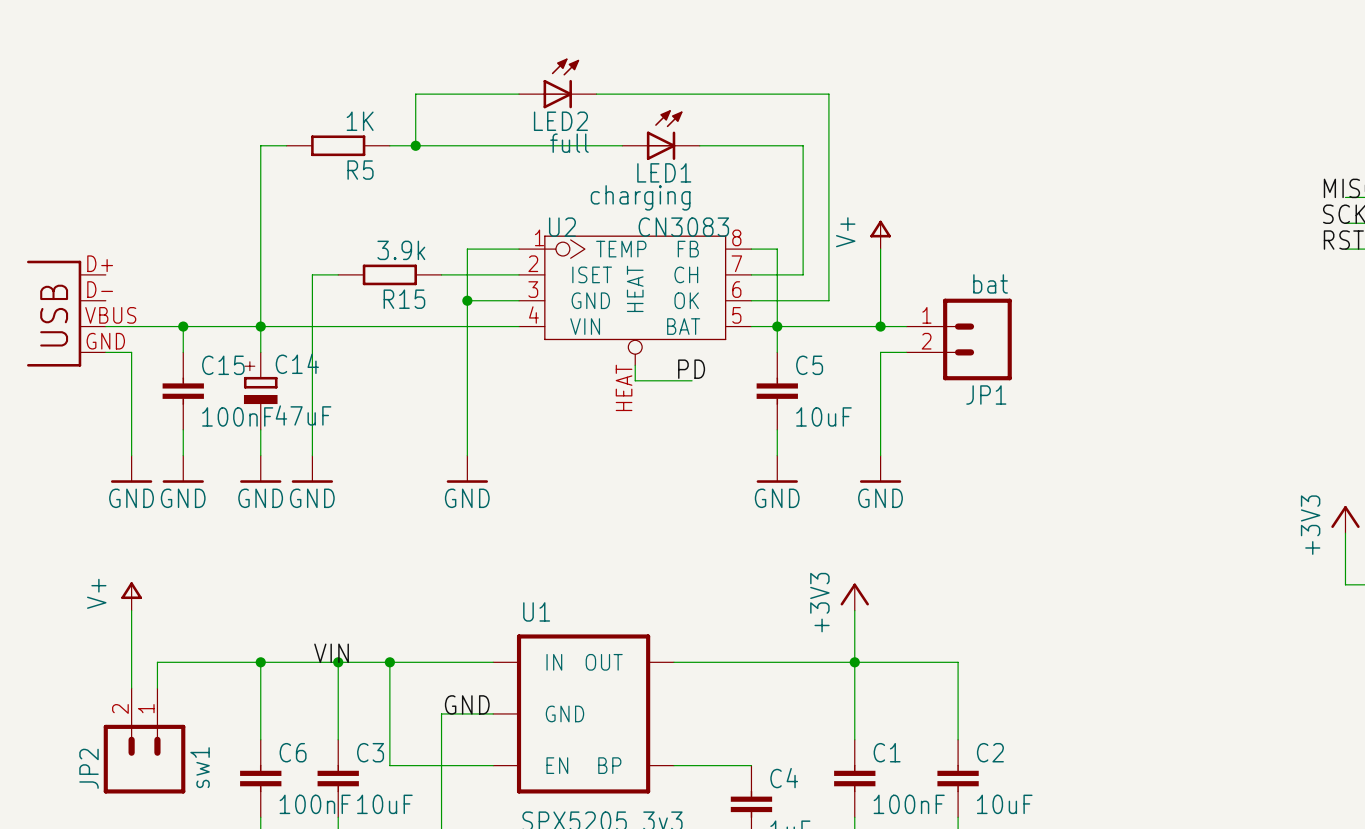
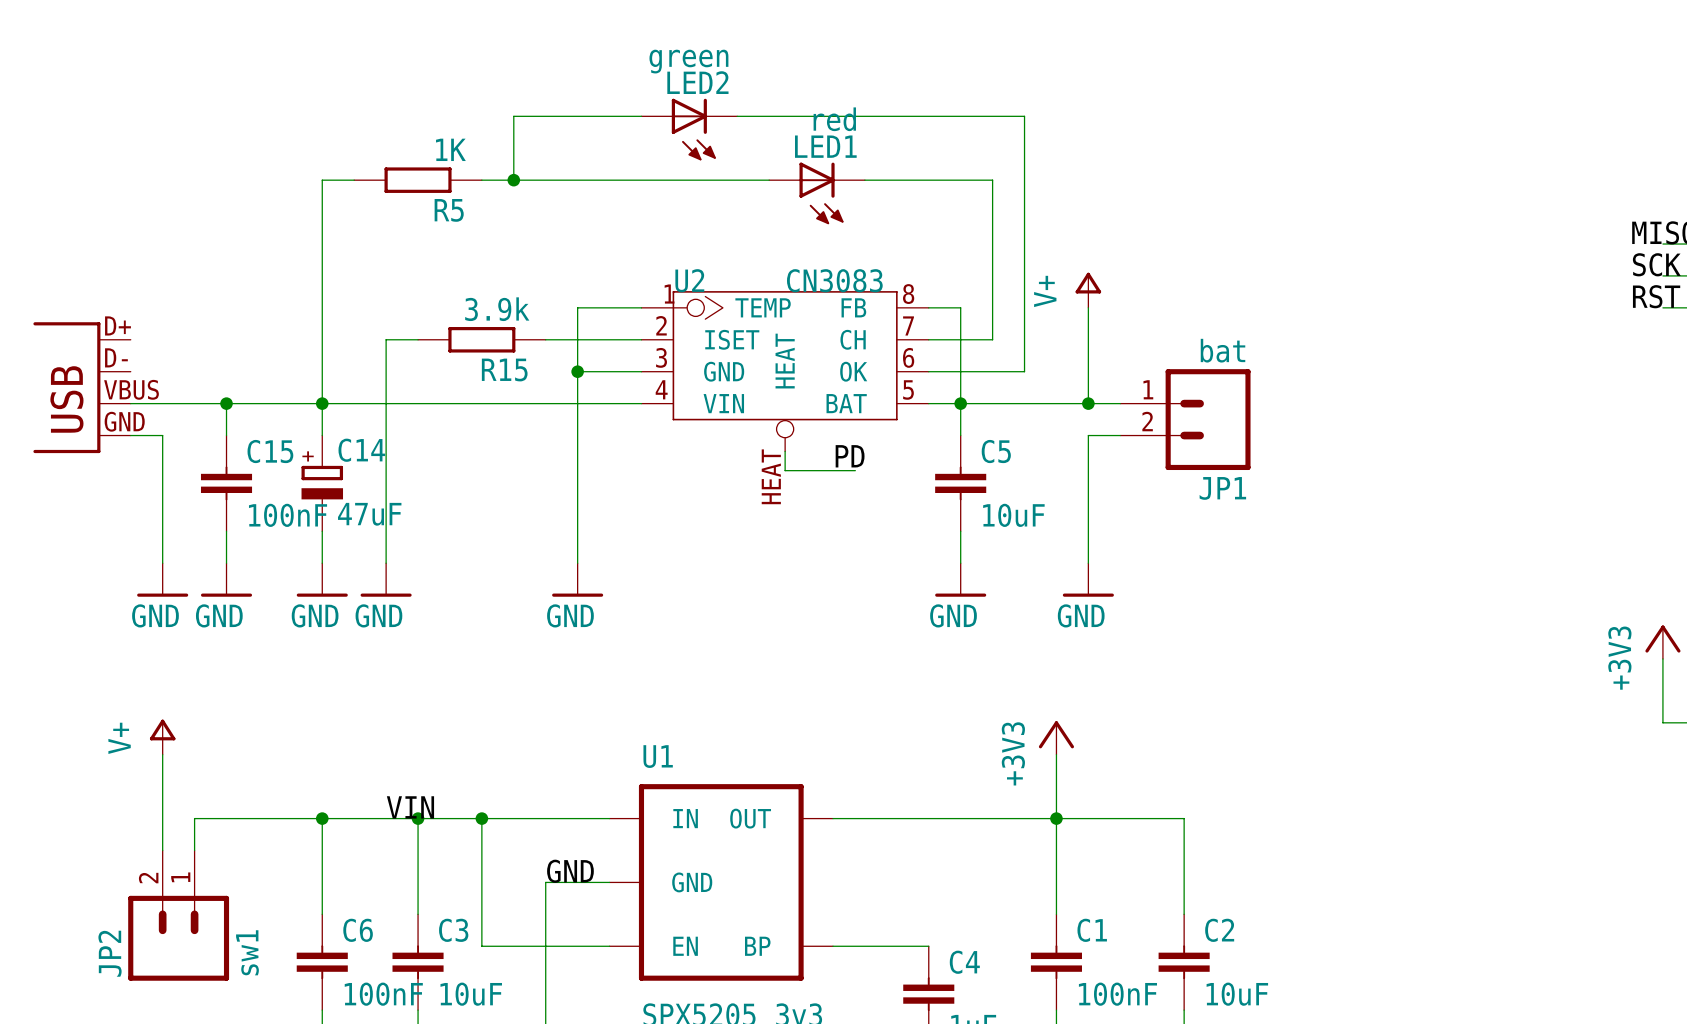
LED2 flip: as is (561, 83) -> up-down (693, 129)
LED1 flip: as is (664, 135) -> up-down (821, 193)
LED2 value: full (569, 143) -> green (688, 61)
LED1 value: charging (640, 197) -> red (834, 119)

